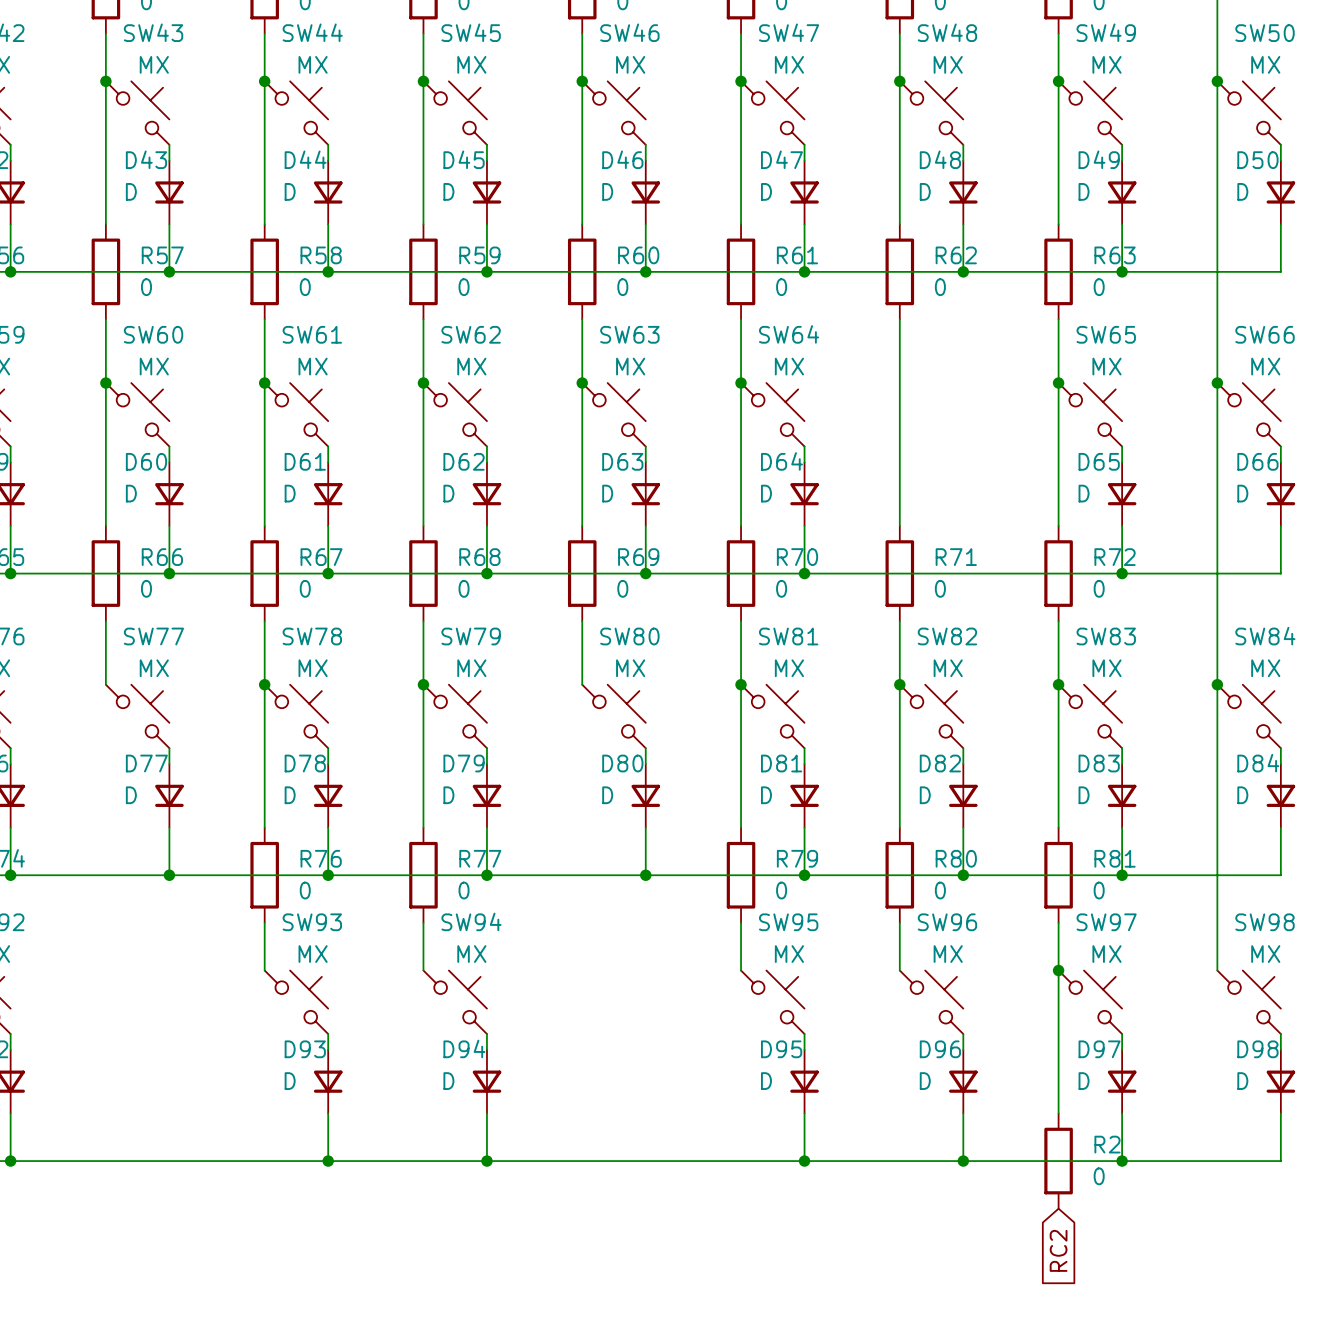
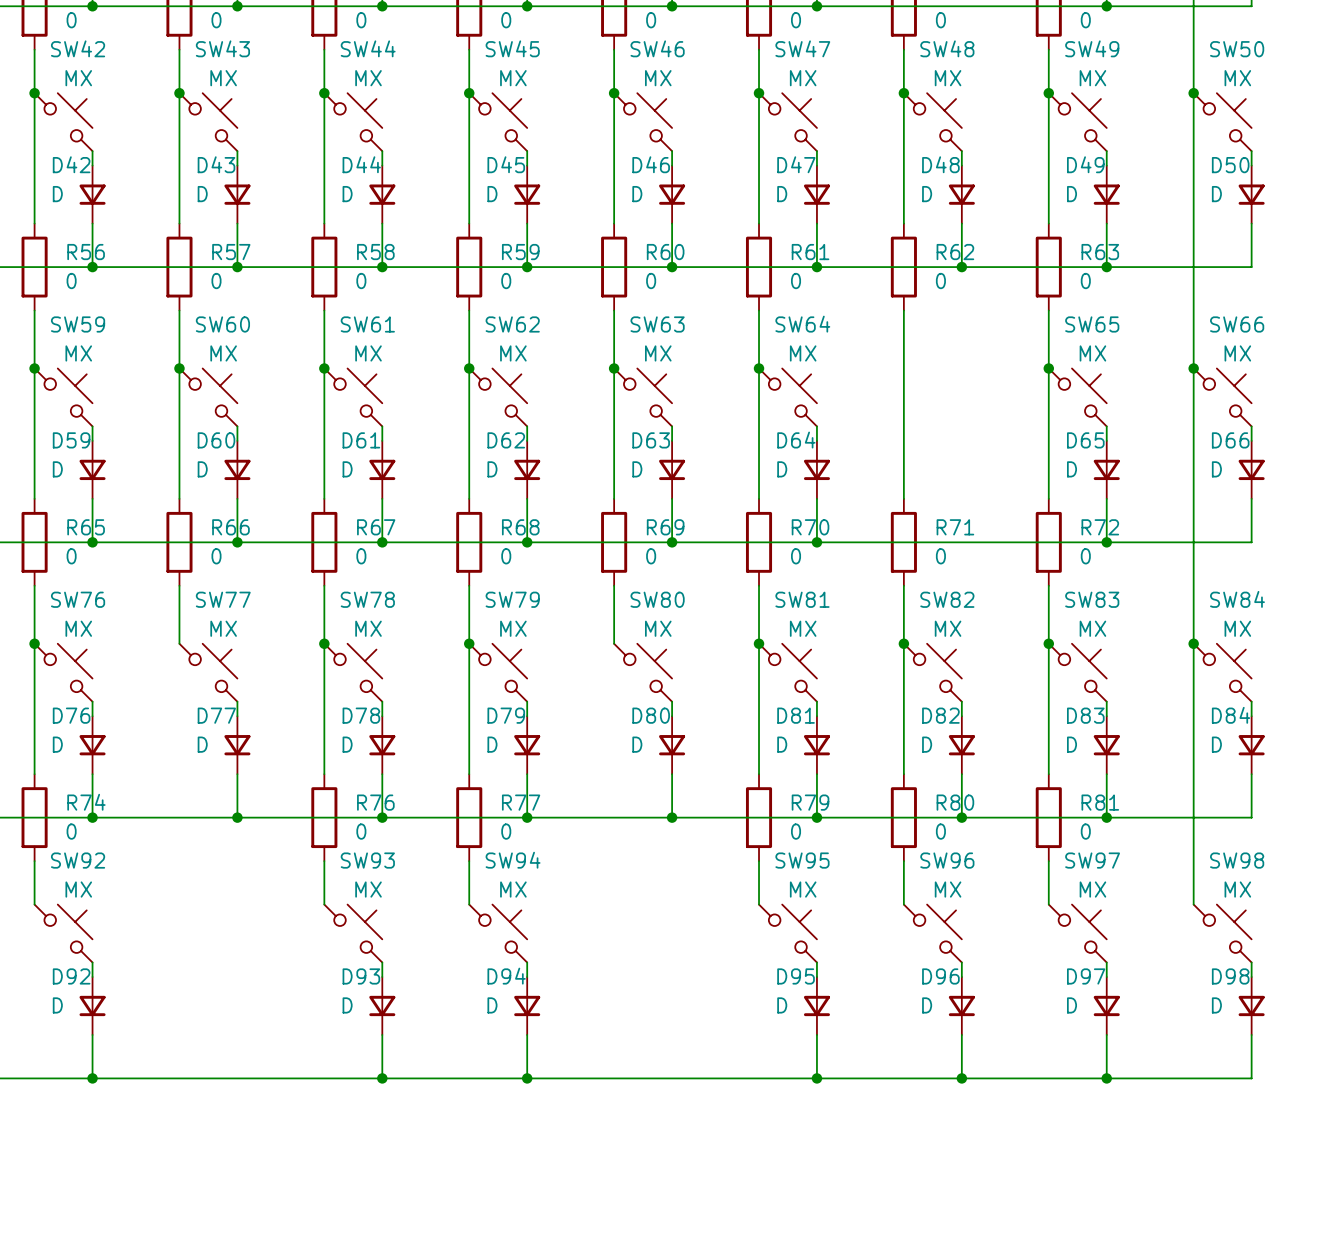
wire: (1058, 970) (1058, 1113) -> none
junction: (1058, 970) -> none
R2: 0 (1058, 1161) -> none
global label: RC2 (1058, 1250) -> none

